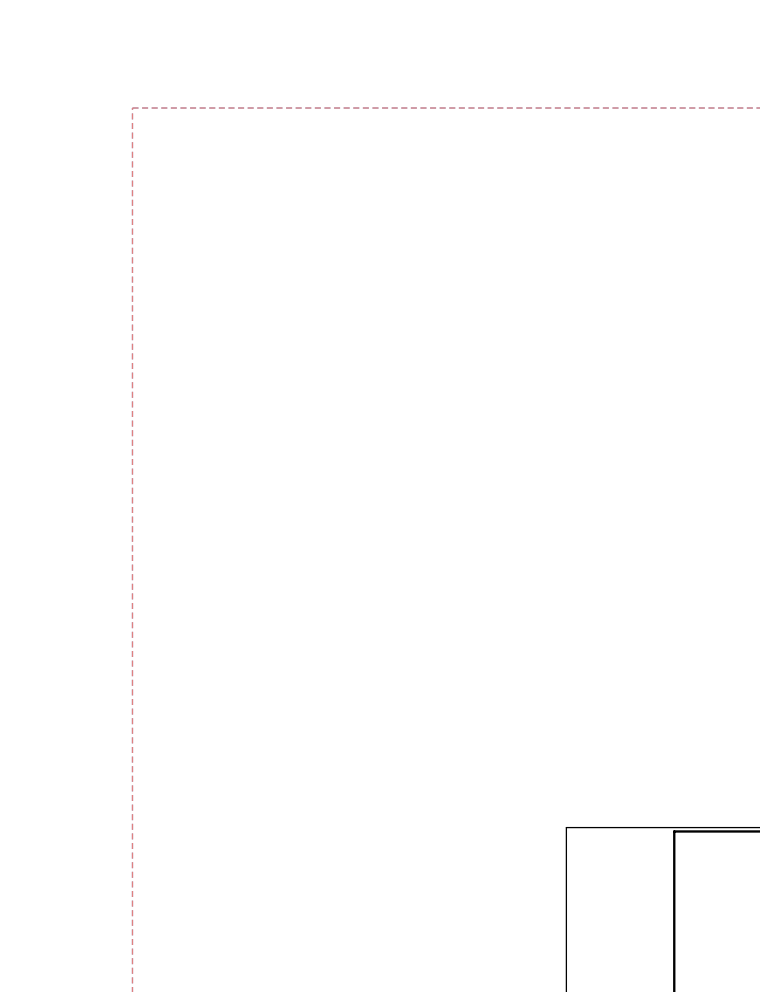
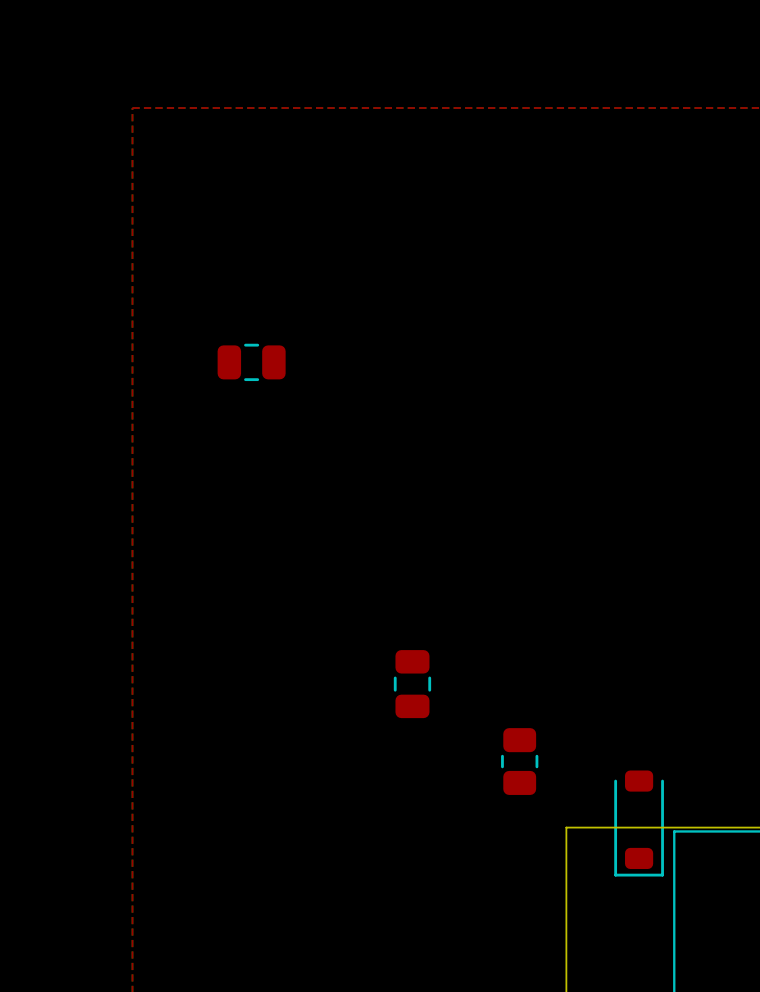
part: none -> (251, 362)
part: none -> (412, 684)
part: none -> (519, 761)
part: none -> (639, 823)

